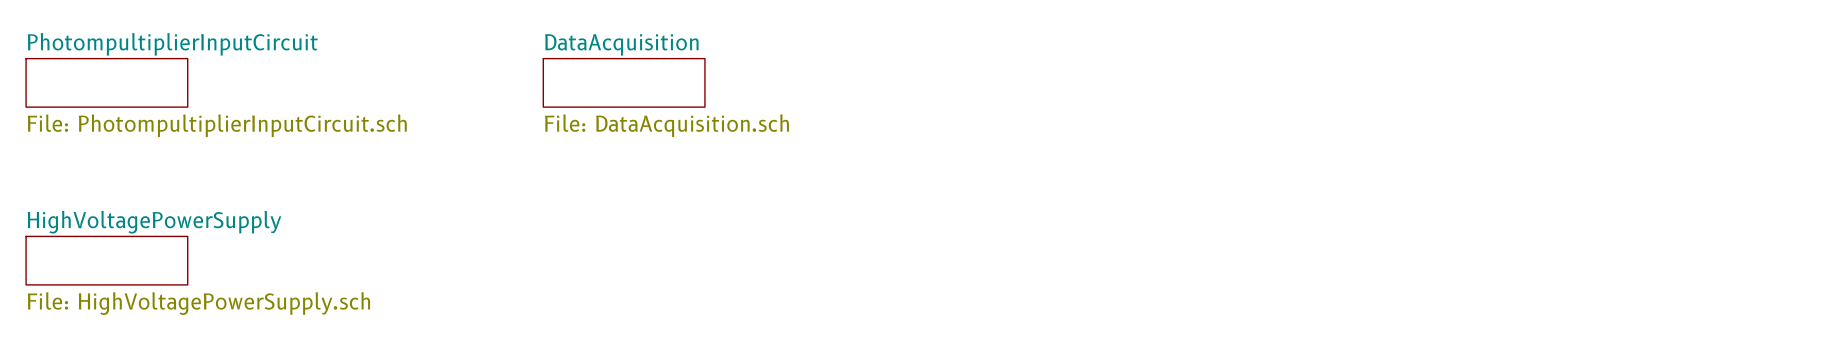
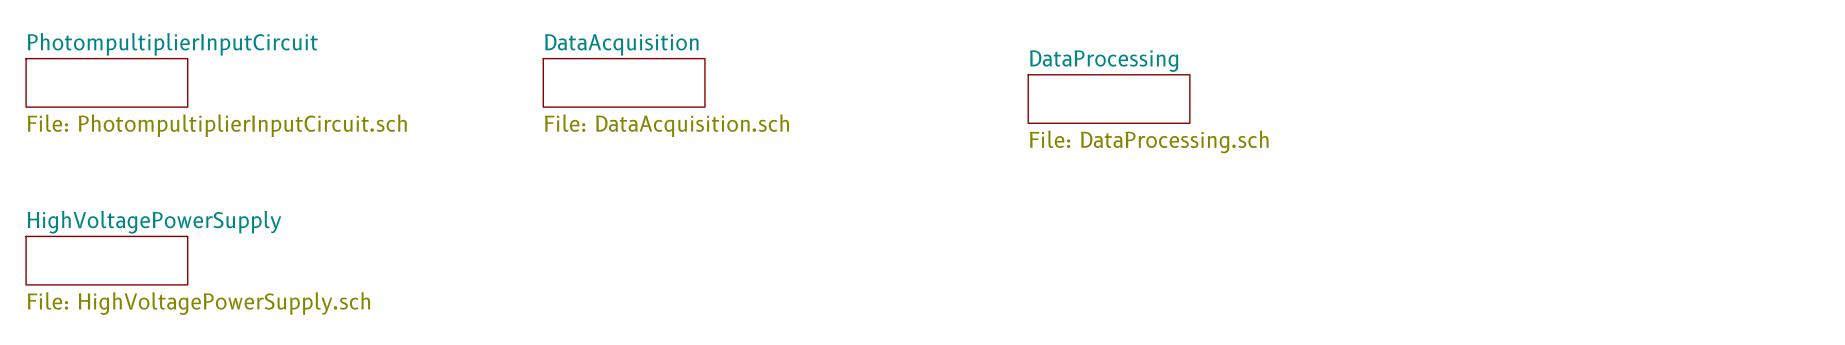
sheet DataProcessing: none -> File: DataProcessing.sch (1109, 99)

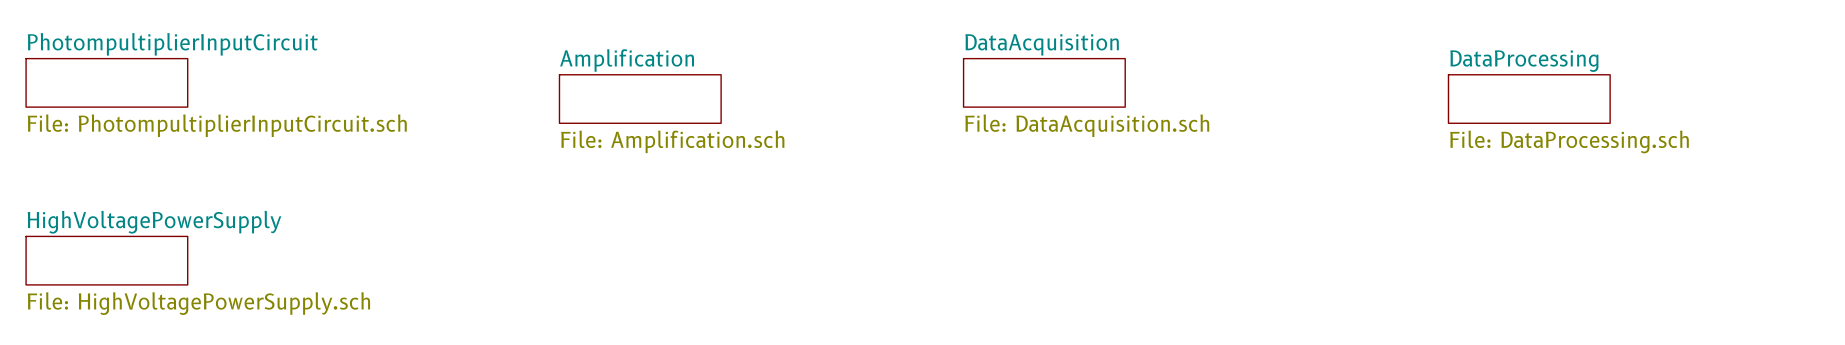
sheet DataAcquisition: File: DataAcquisition.sch (624, 82) -> none
sheet DataAcquisition: none -> File: DataAcquisition.sch (1044, 82)
sheet Amplification: none -> File: Amplification.sch (640, 99)
sheet DataProcessing: File: DataProcessing.sch (1109, 99) -> none
sheet DataProcessing: none -> File: DataProcessing.sch (1529, 99)

